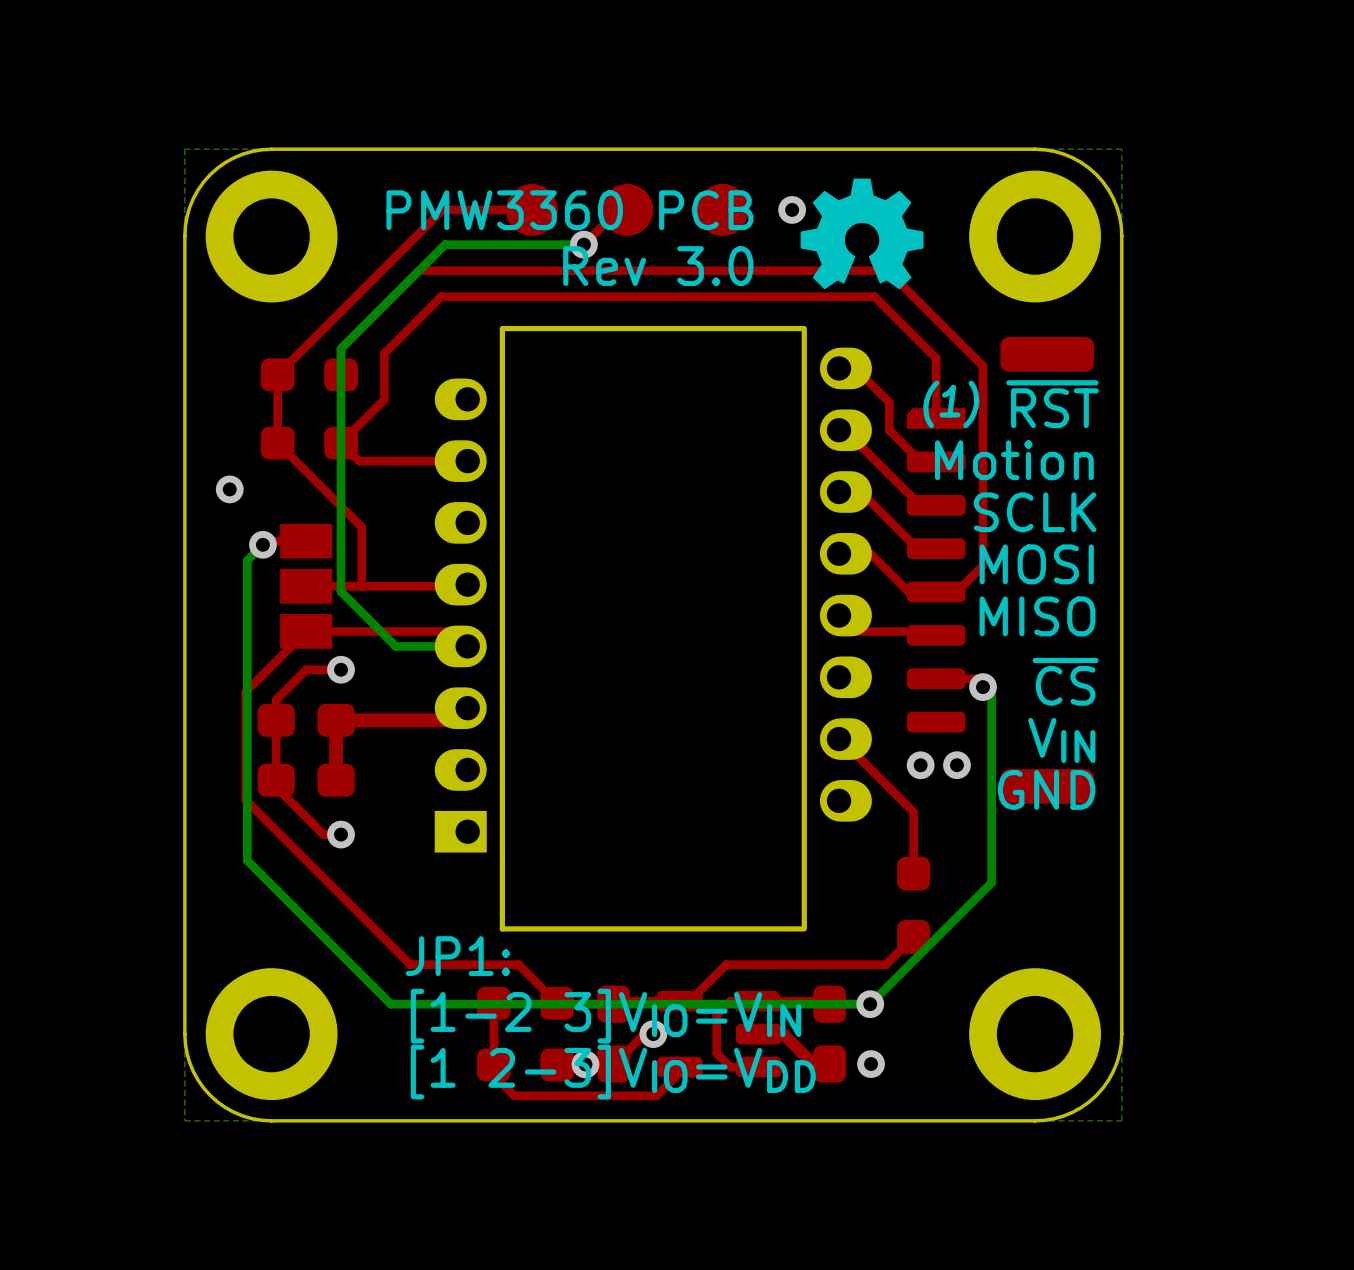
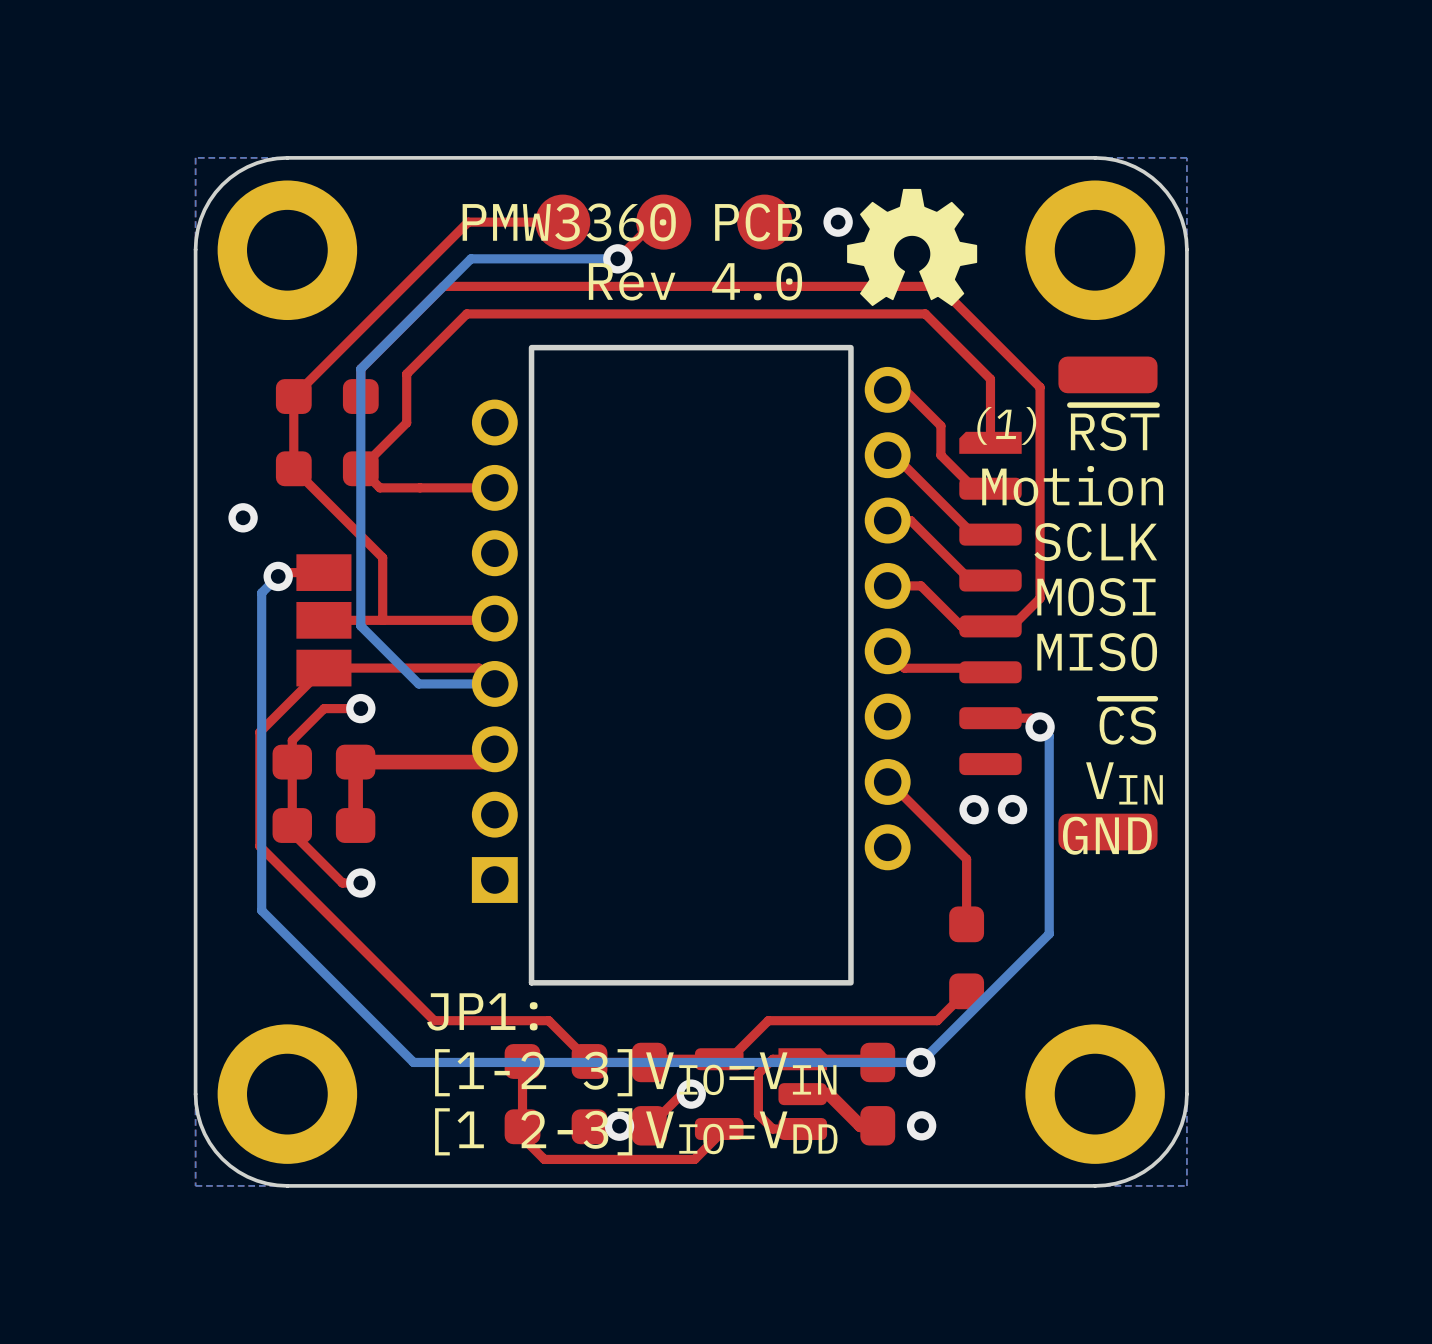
text: Rev 3.0 (658, 266) -> Rev 4.0 (695, 281)
part footprint: [434, 325, 872, 932] -> [471, 344, 911, 986]

